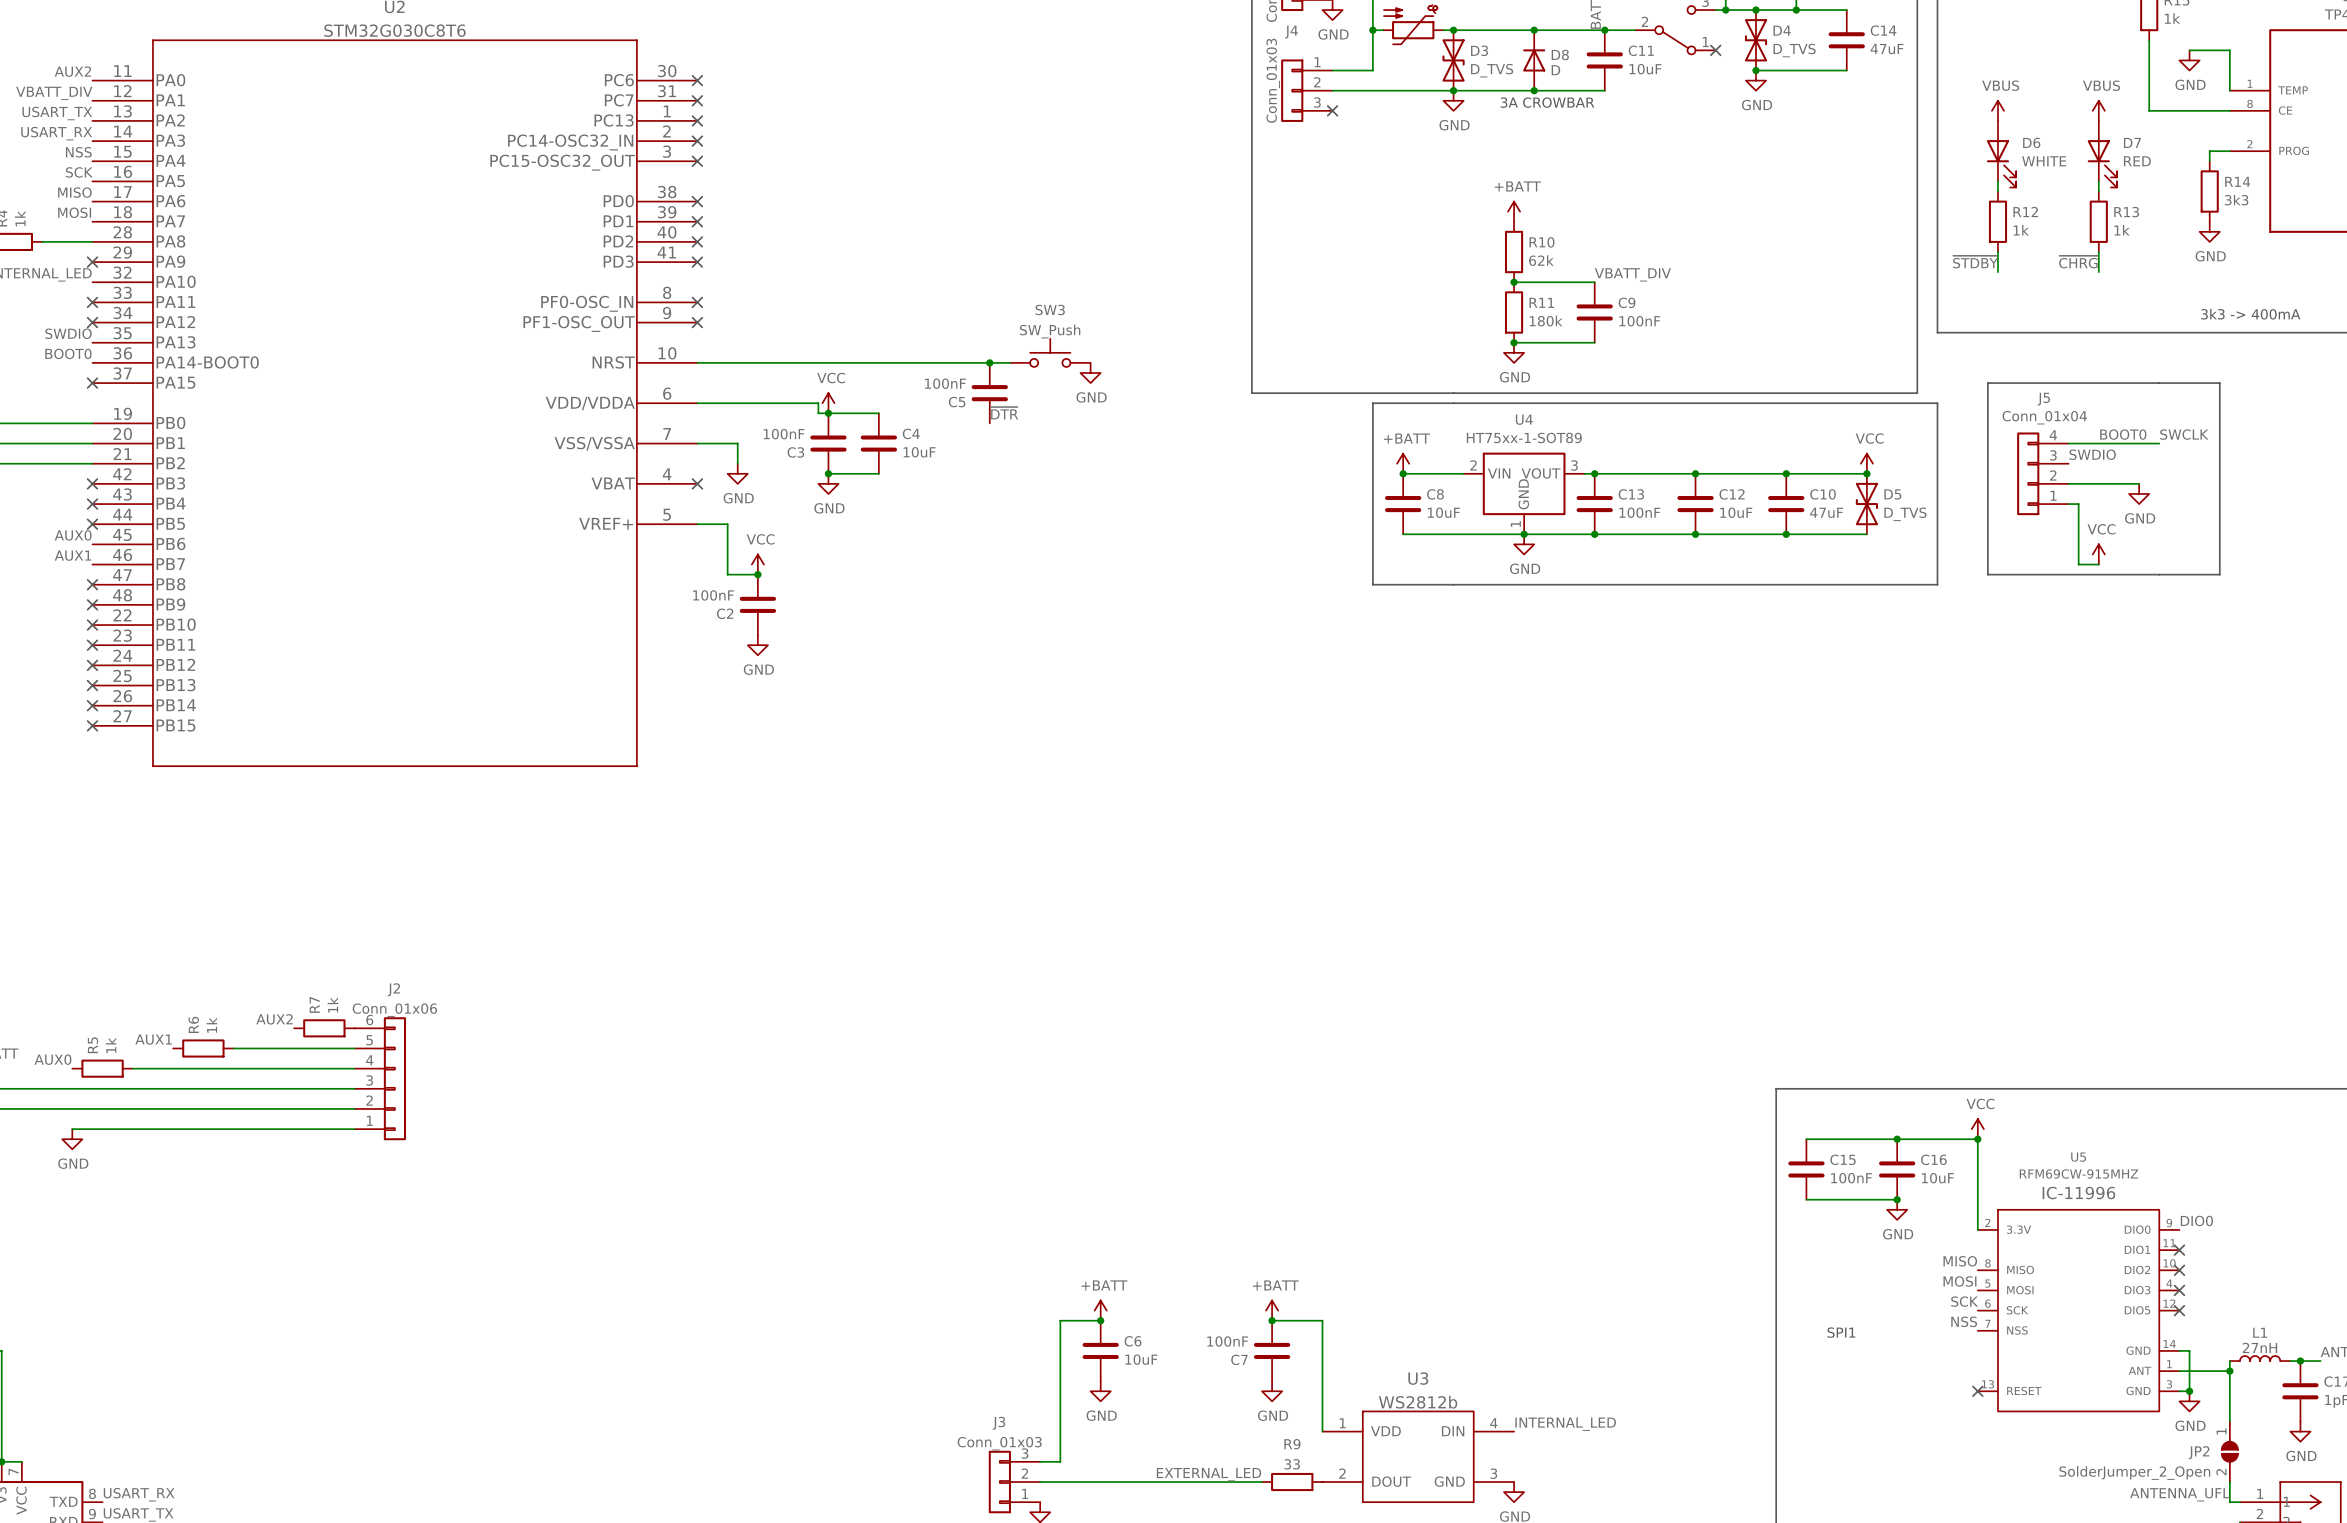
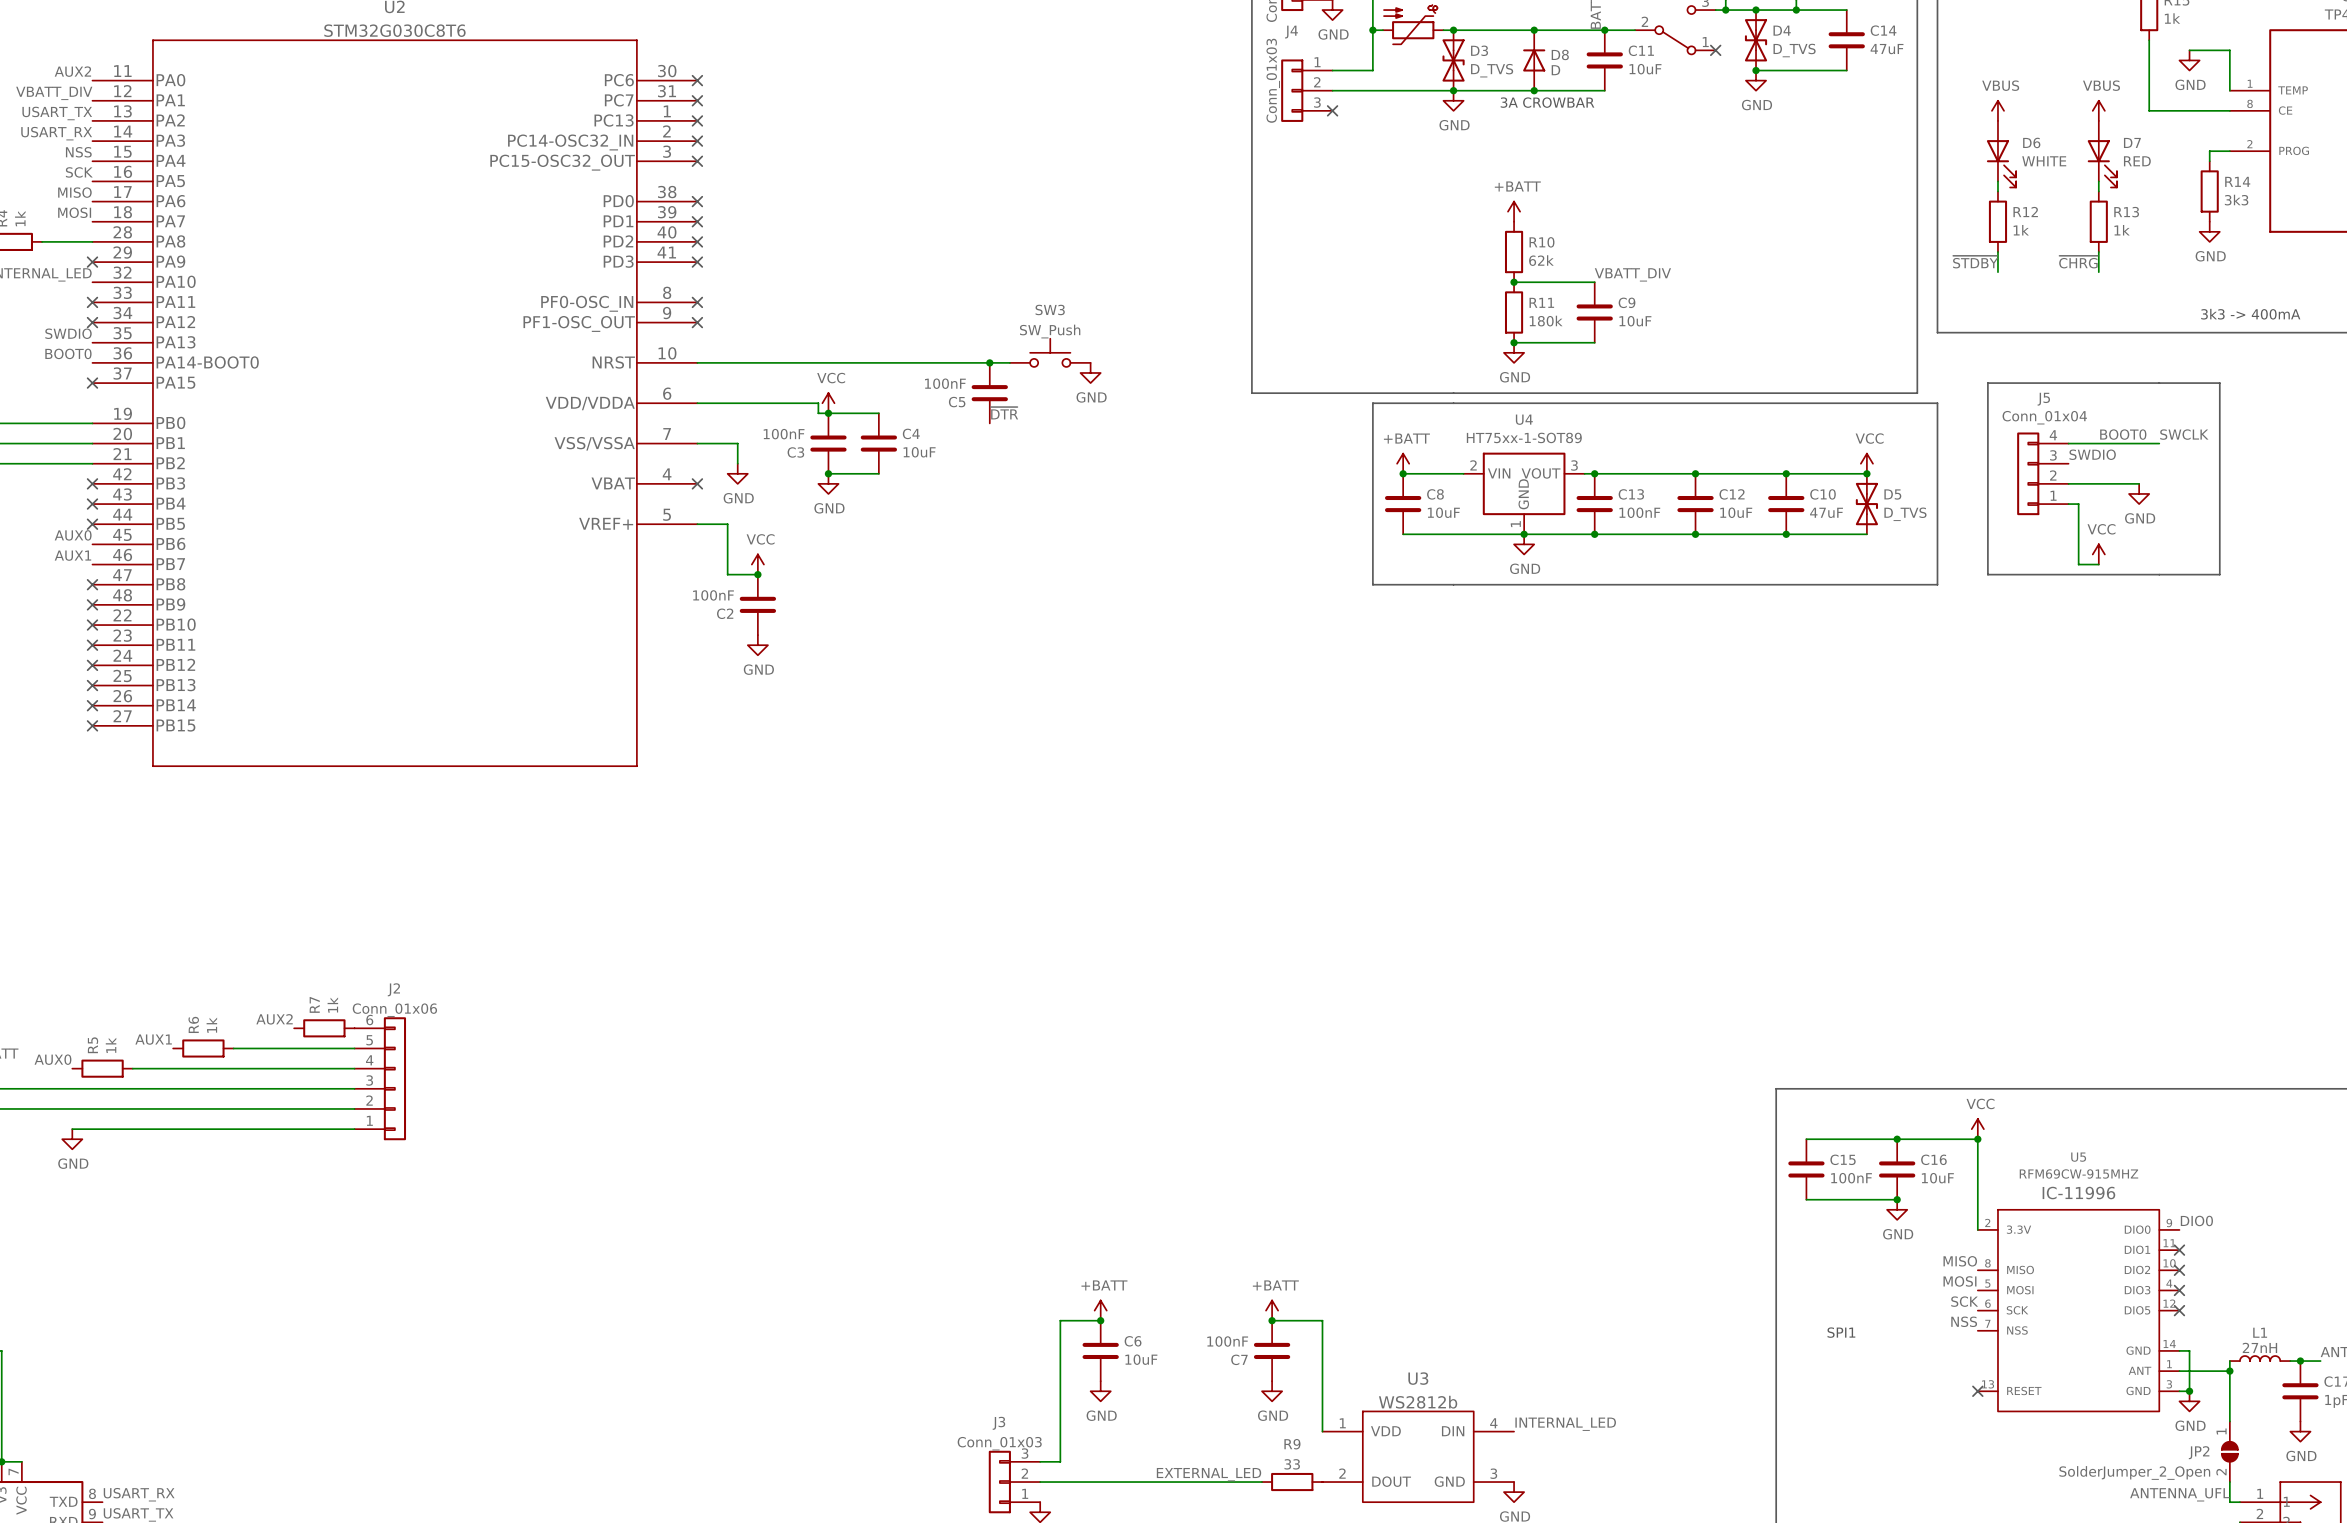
C9 value: 100nF (1639, 321) -> 10uF (1635, 321)

